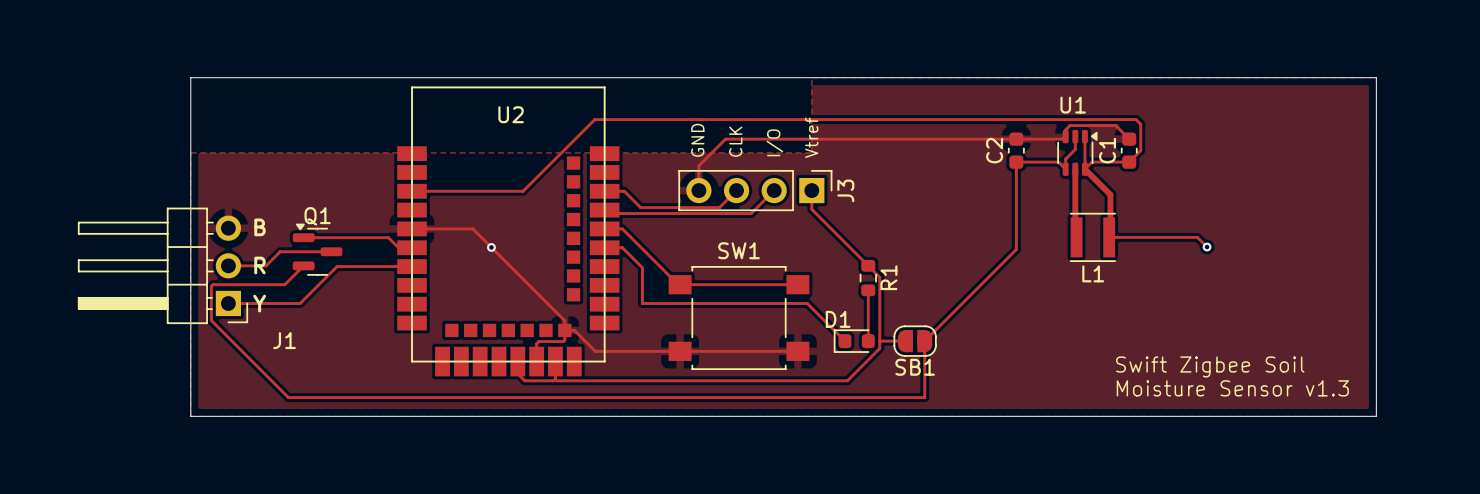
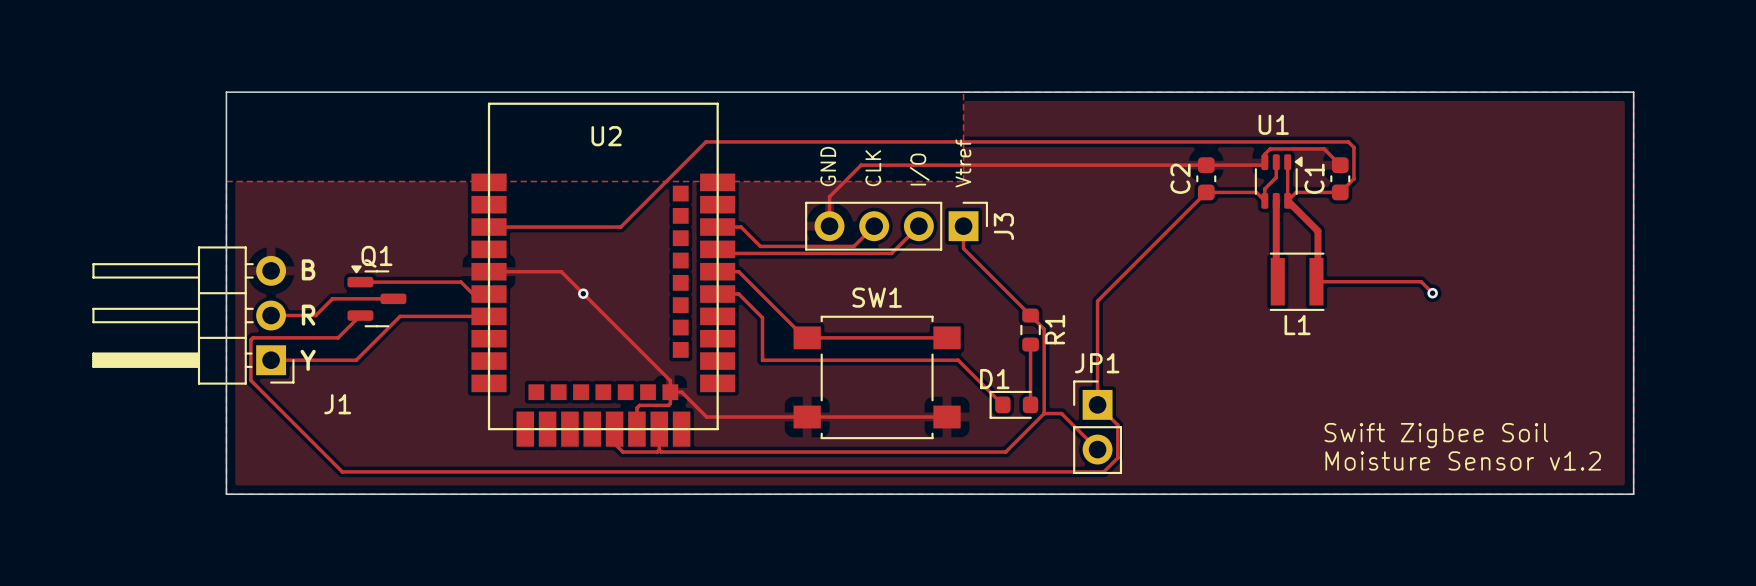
track: (1016, 162) (1016, 249) (924, 341) (924, 397) -> (1206, 192) (1097, 301) (1097, 404) (1117, 425) (1117, 457) (1103, 471) (1097, 471)
track: (879, 341) (905, 341) -> none
SB1: (915, 341) -> none
track: none -> (1044, 413) (1061, 413) (1097, 449)
JP1: none -> (1097, 427)
text: Moisture Sensor v1.3 (1232, 388) -> Moisture Sensor v1.2 (1463, 460)

